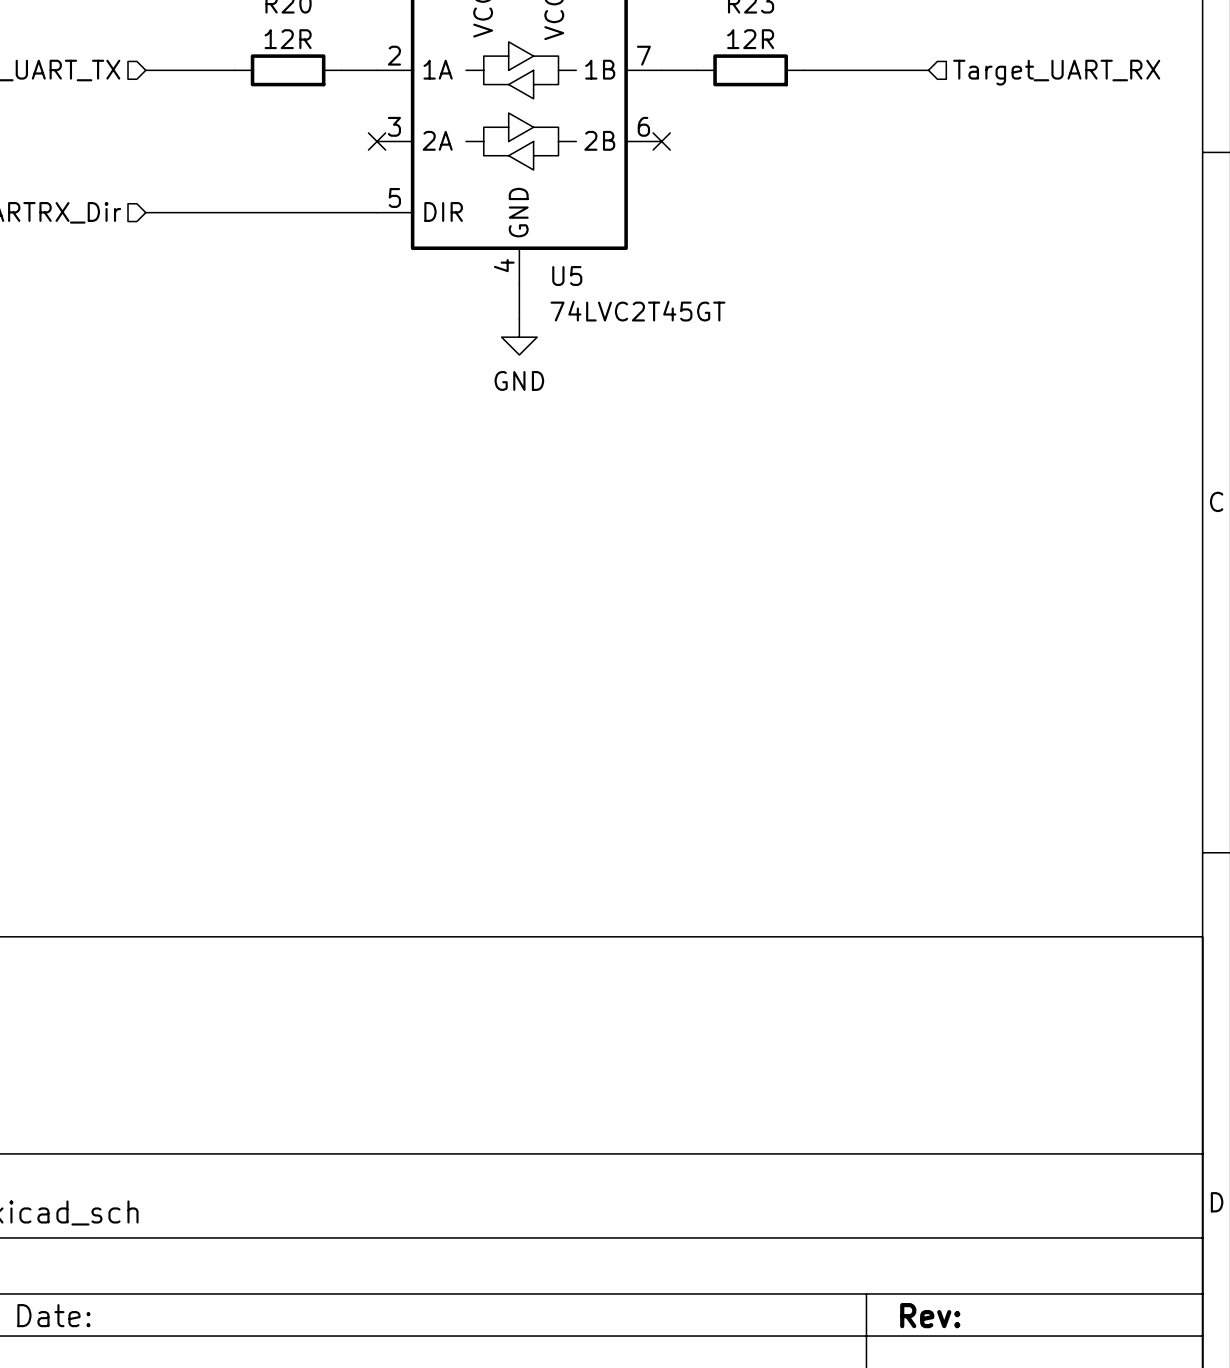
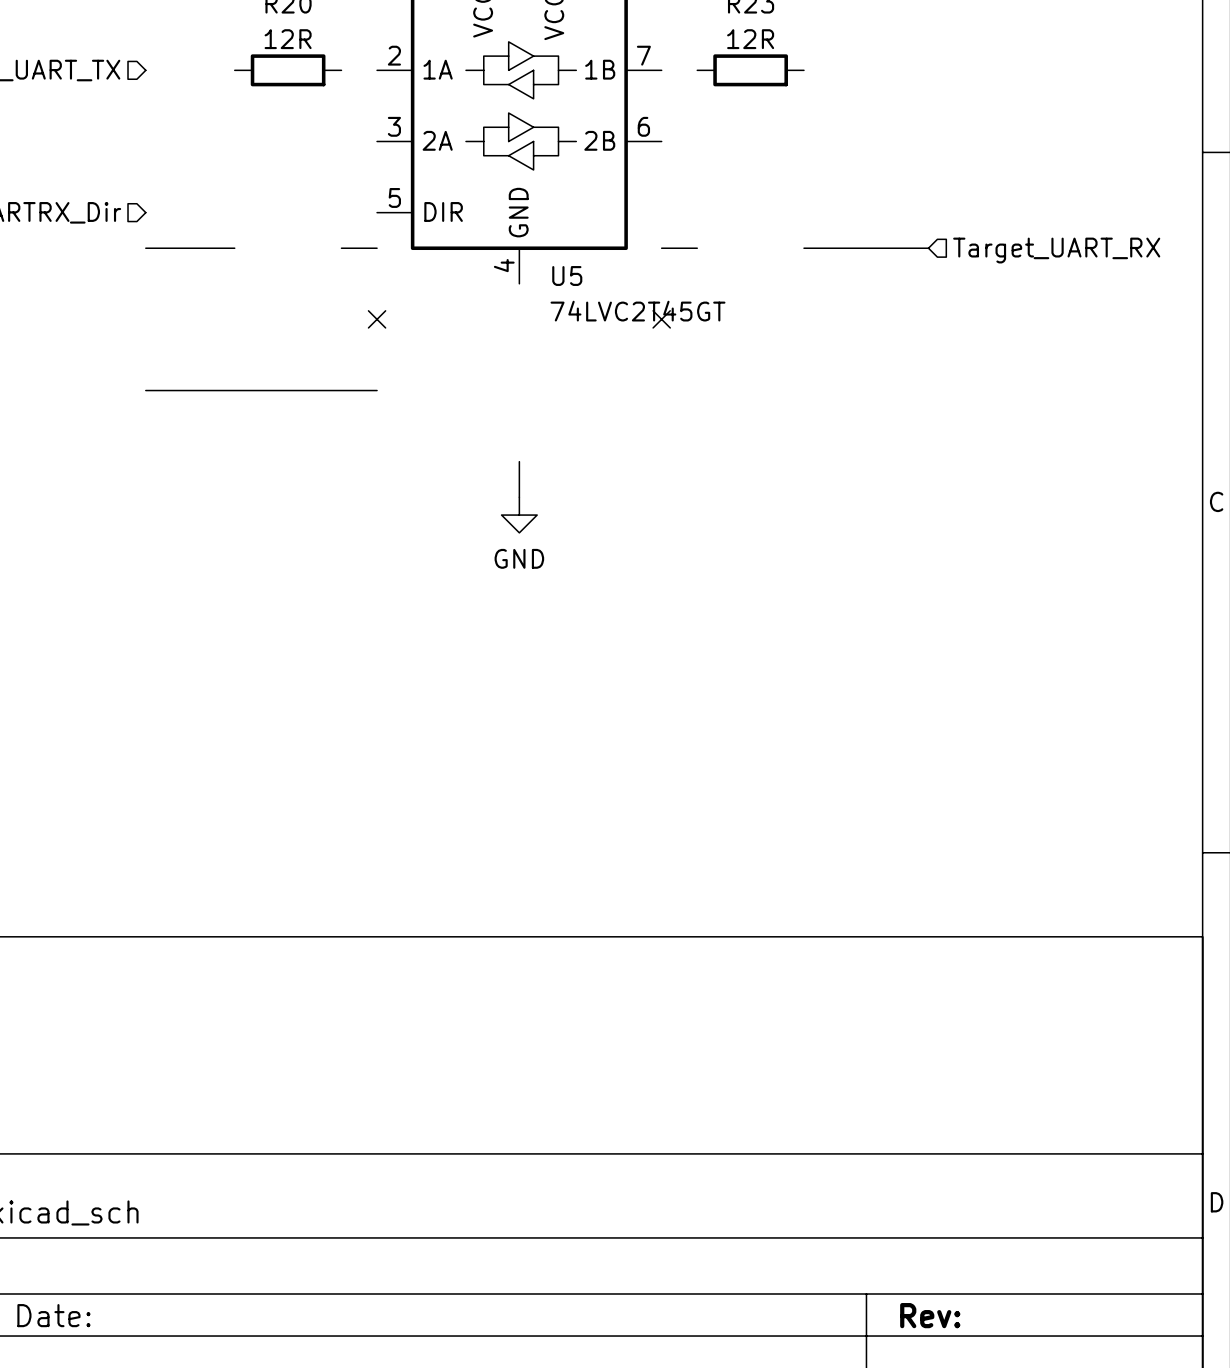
wire: (145, 70) (234, 70) -> (145, 248) (234, 248)
wire: (341, 70) (377, 70) -> (341, 248) (377, 248)
wire: (661, 70) (697, 70) -> (661, 248) (697, 248)
wire: (803, 70) (928, 70) -> (803, 248) (928, 248)
hierarchical label position: Target_UART_RX (1056, 72) -> Target_UART_RX (1056, 250)
no-connect mark: (377, 141) -> none
no-connect mark: (661, 141) -> none
wire: (145, 212) (377, 212) -> (145, 390) (377, 390)
wire: (519, 283) (519, 319) -> (519, 461) (519, 497)
no-connect mark: none -> (377, 319)
no-connect mark: none -> (661, 319)
power symbol position: GND (519, 337) -> GND (519, 515)

